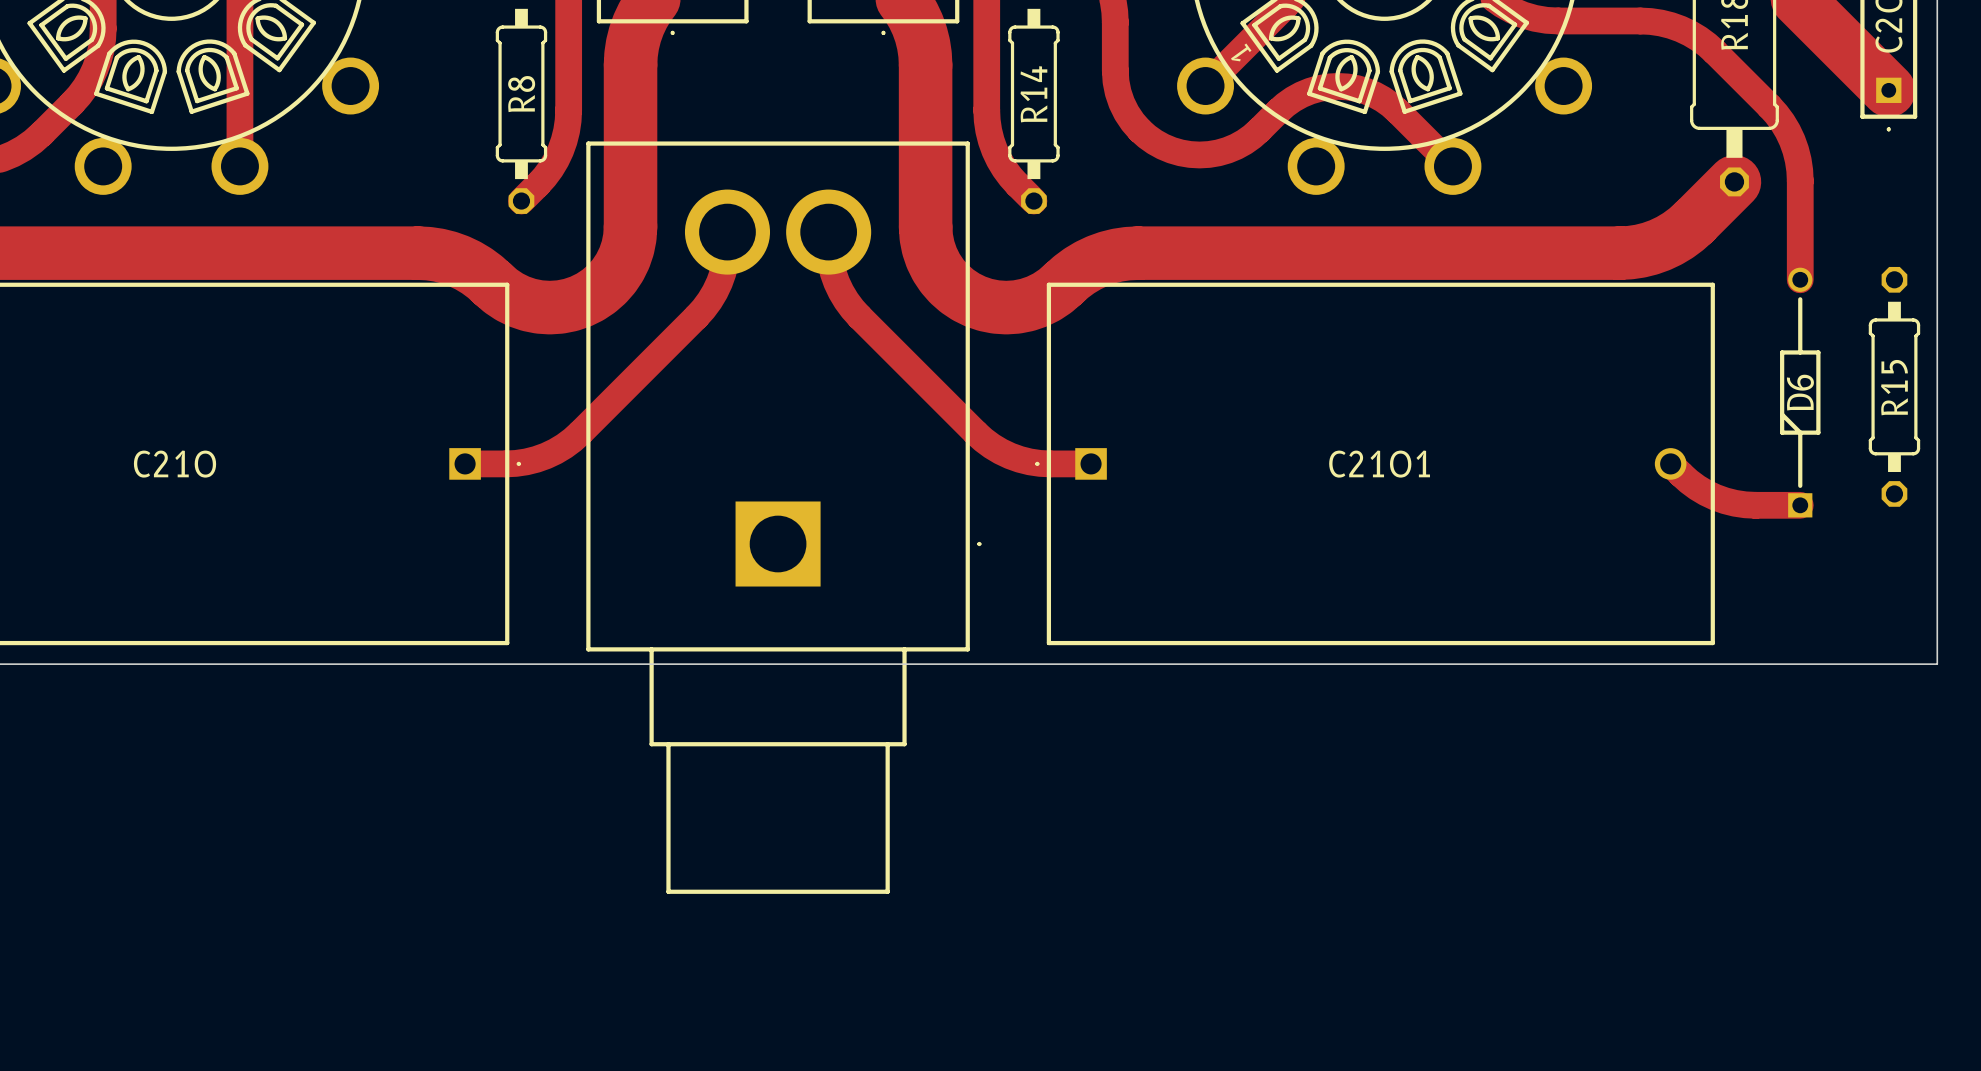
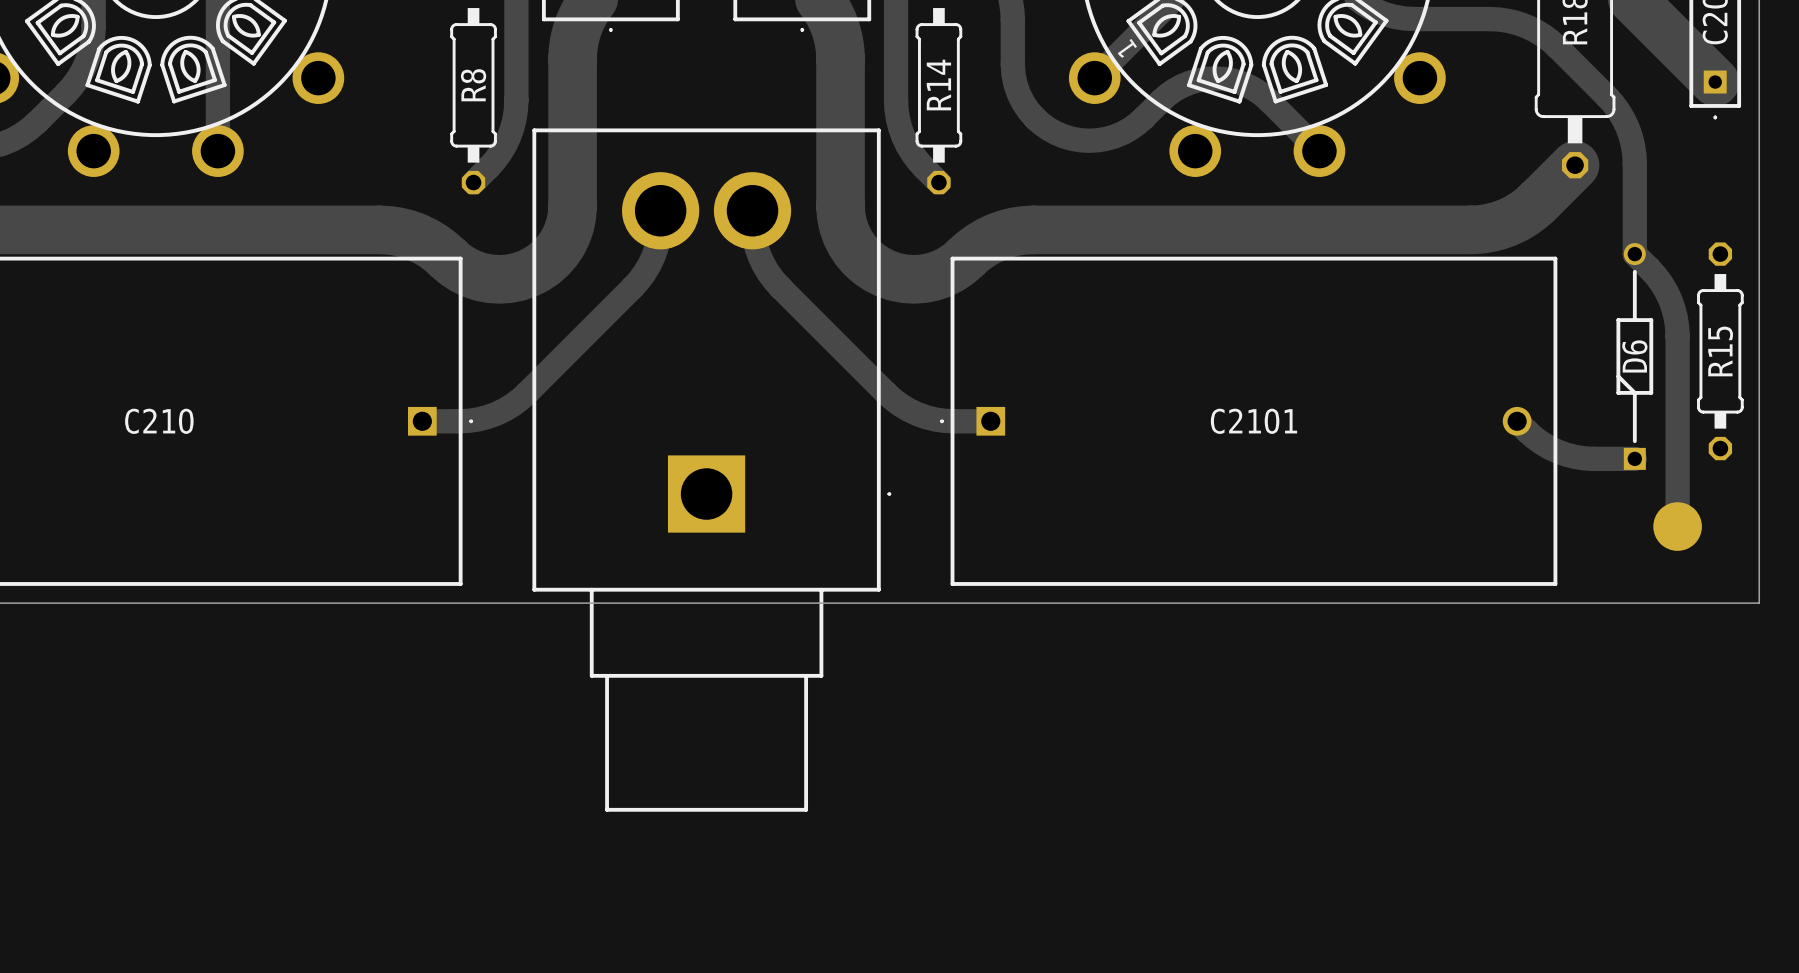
track: none -> (1634, 254) (1661, 283) (1670, 299) (1675, 317) (1677, 336) (1677, 526)
part: none -> (1677, 526)

